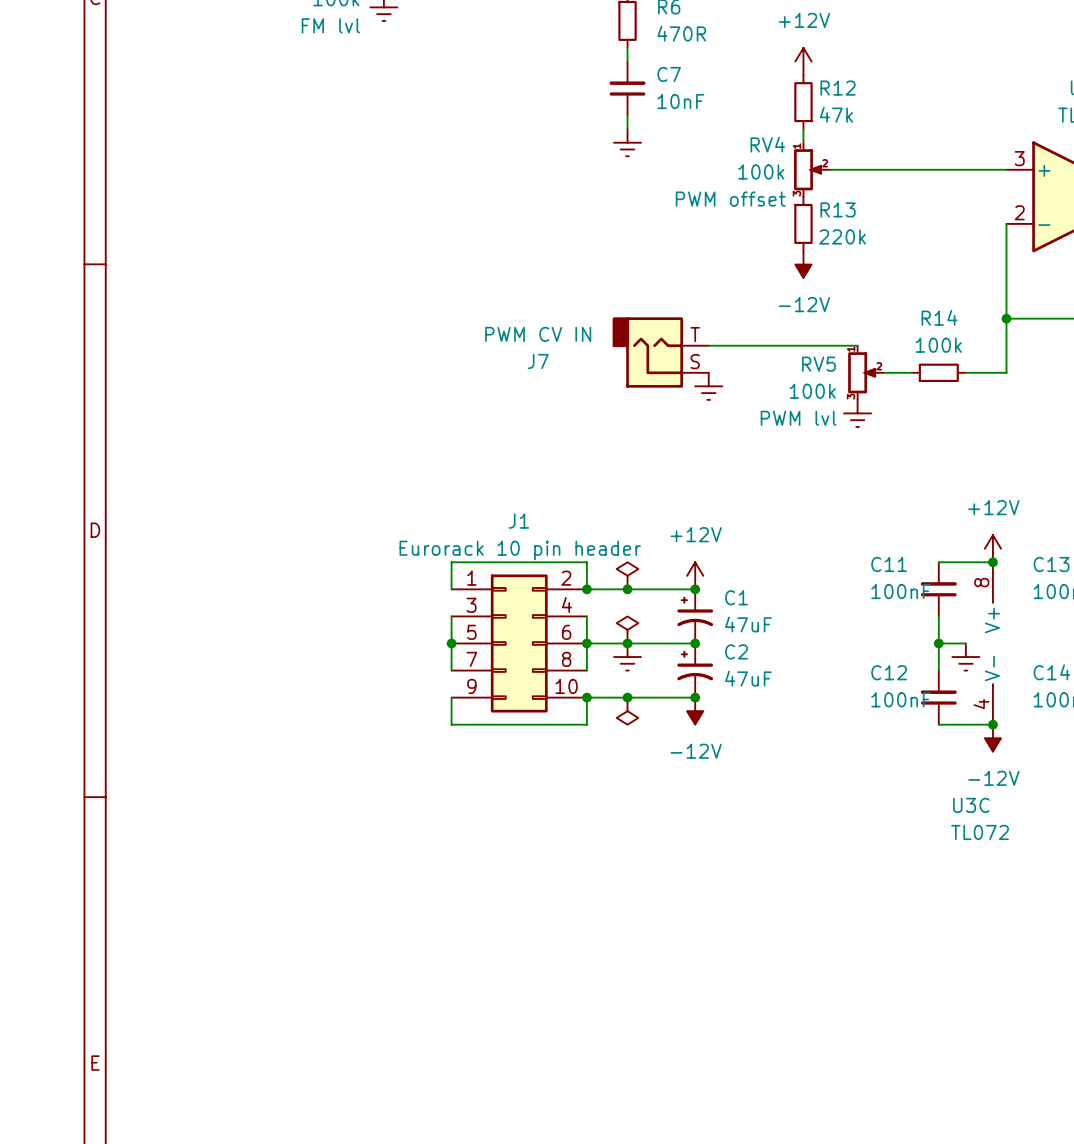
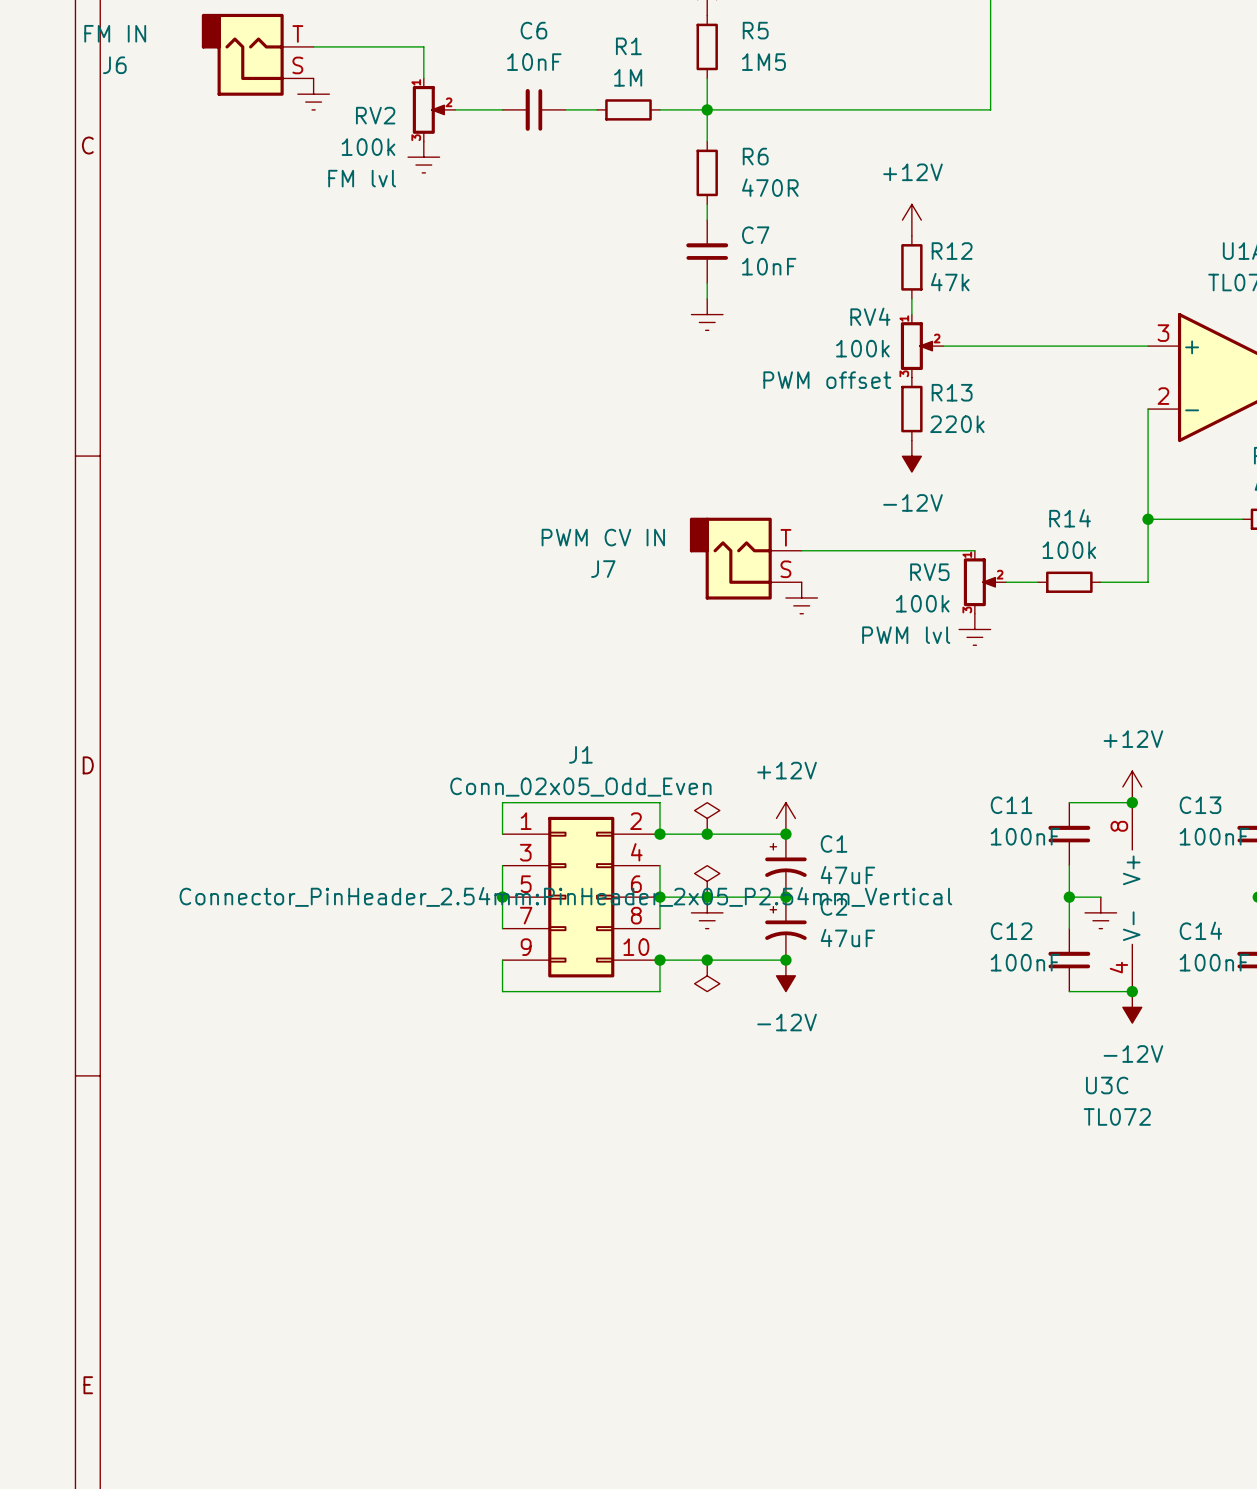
J1 value: Eurorack 10 pin header (520, 550) -> Conn_02x05_Odd_Even (580, 787)
J1 text: none -> Connector_PinHeader_2.54mm:PinHeader_2x05_P2.54mm_Vertical (565, 896)

